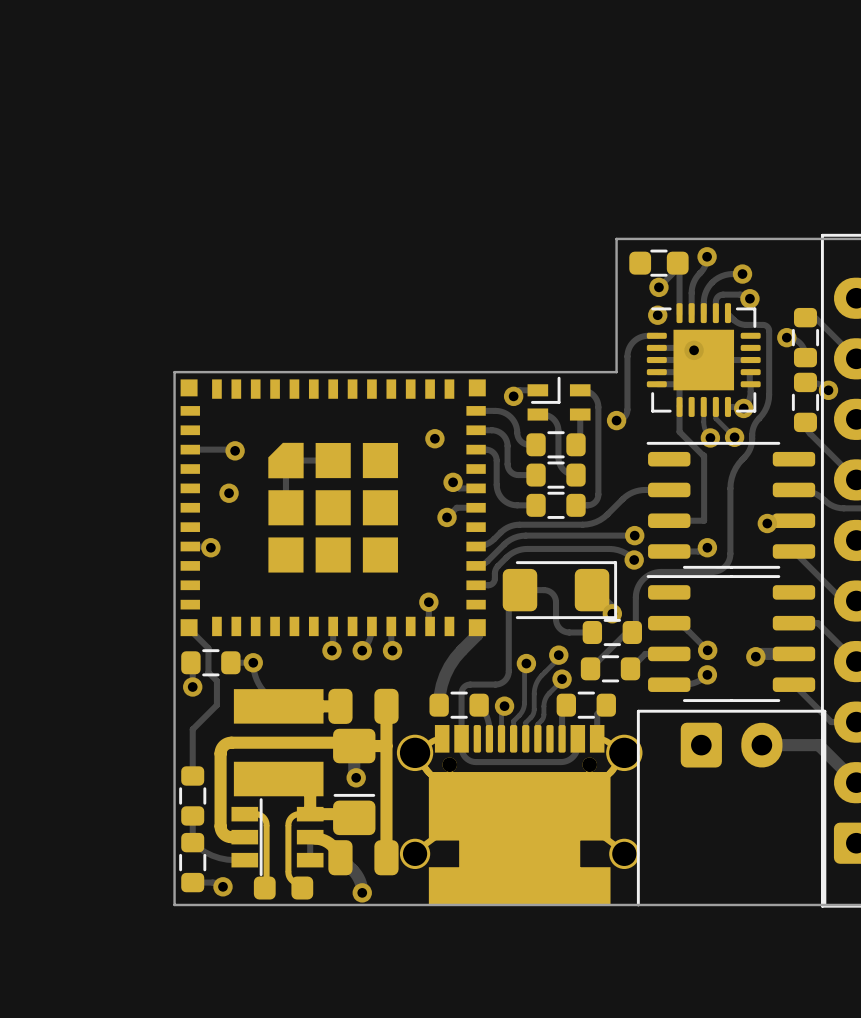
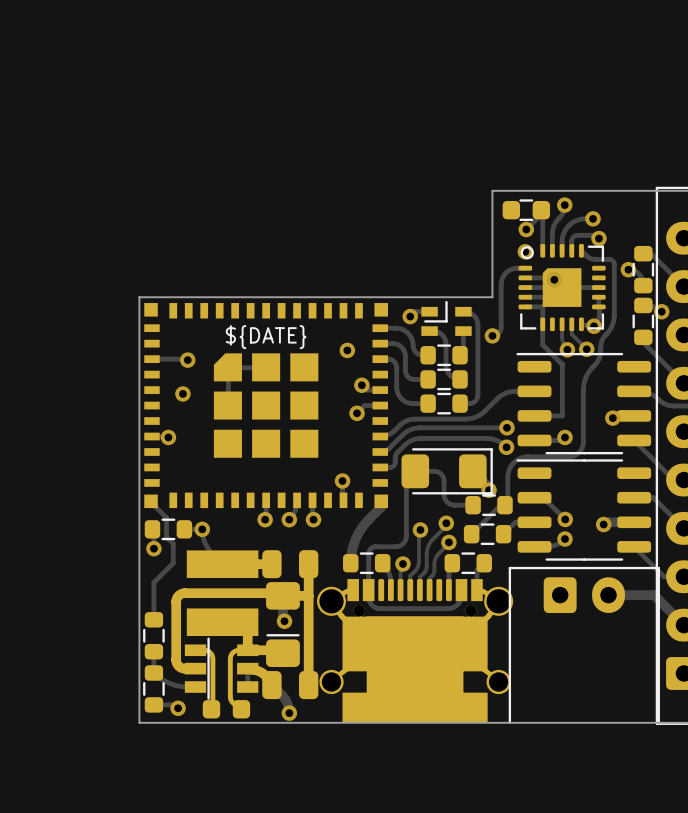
part footprint: [646, 303, 761, 417] -> [518, 244, 606, 332]
part footprint: [180, 379, 486, 637] -> [144, 303, 388, 509]

